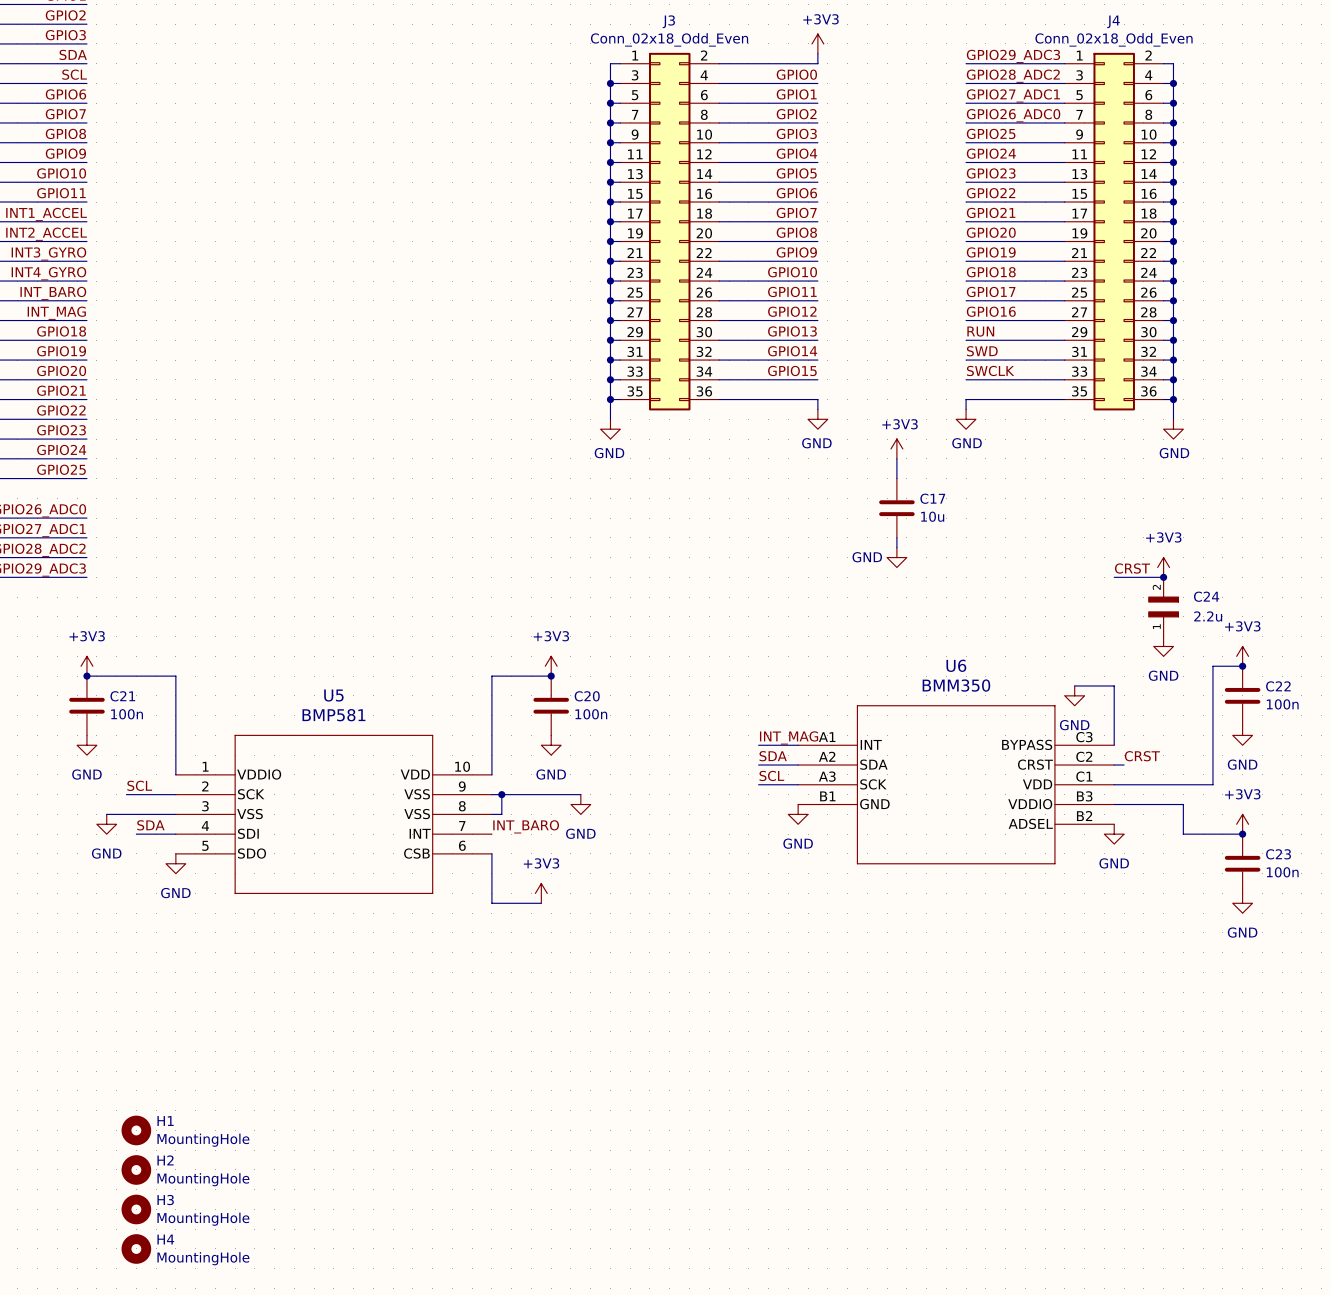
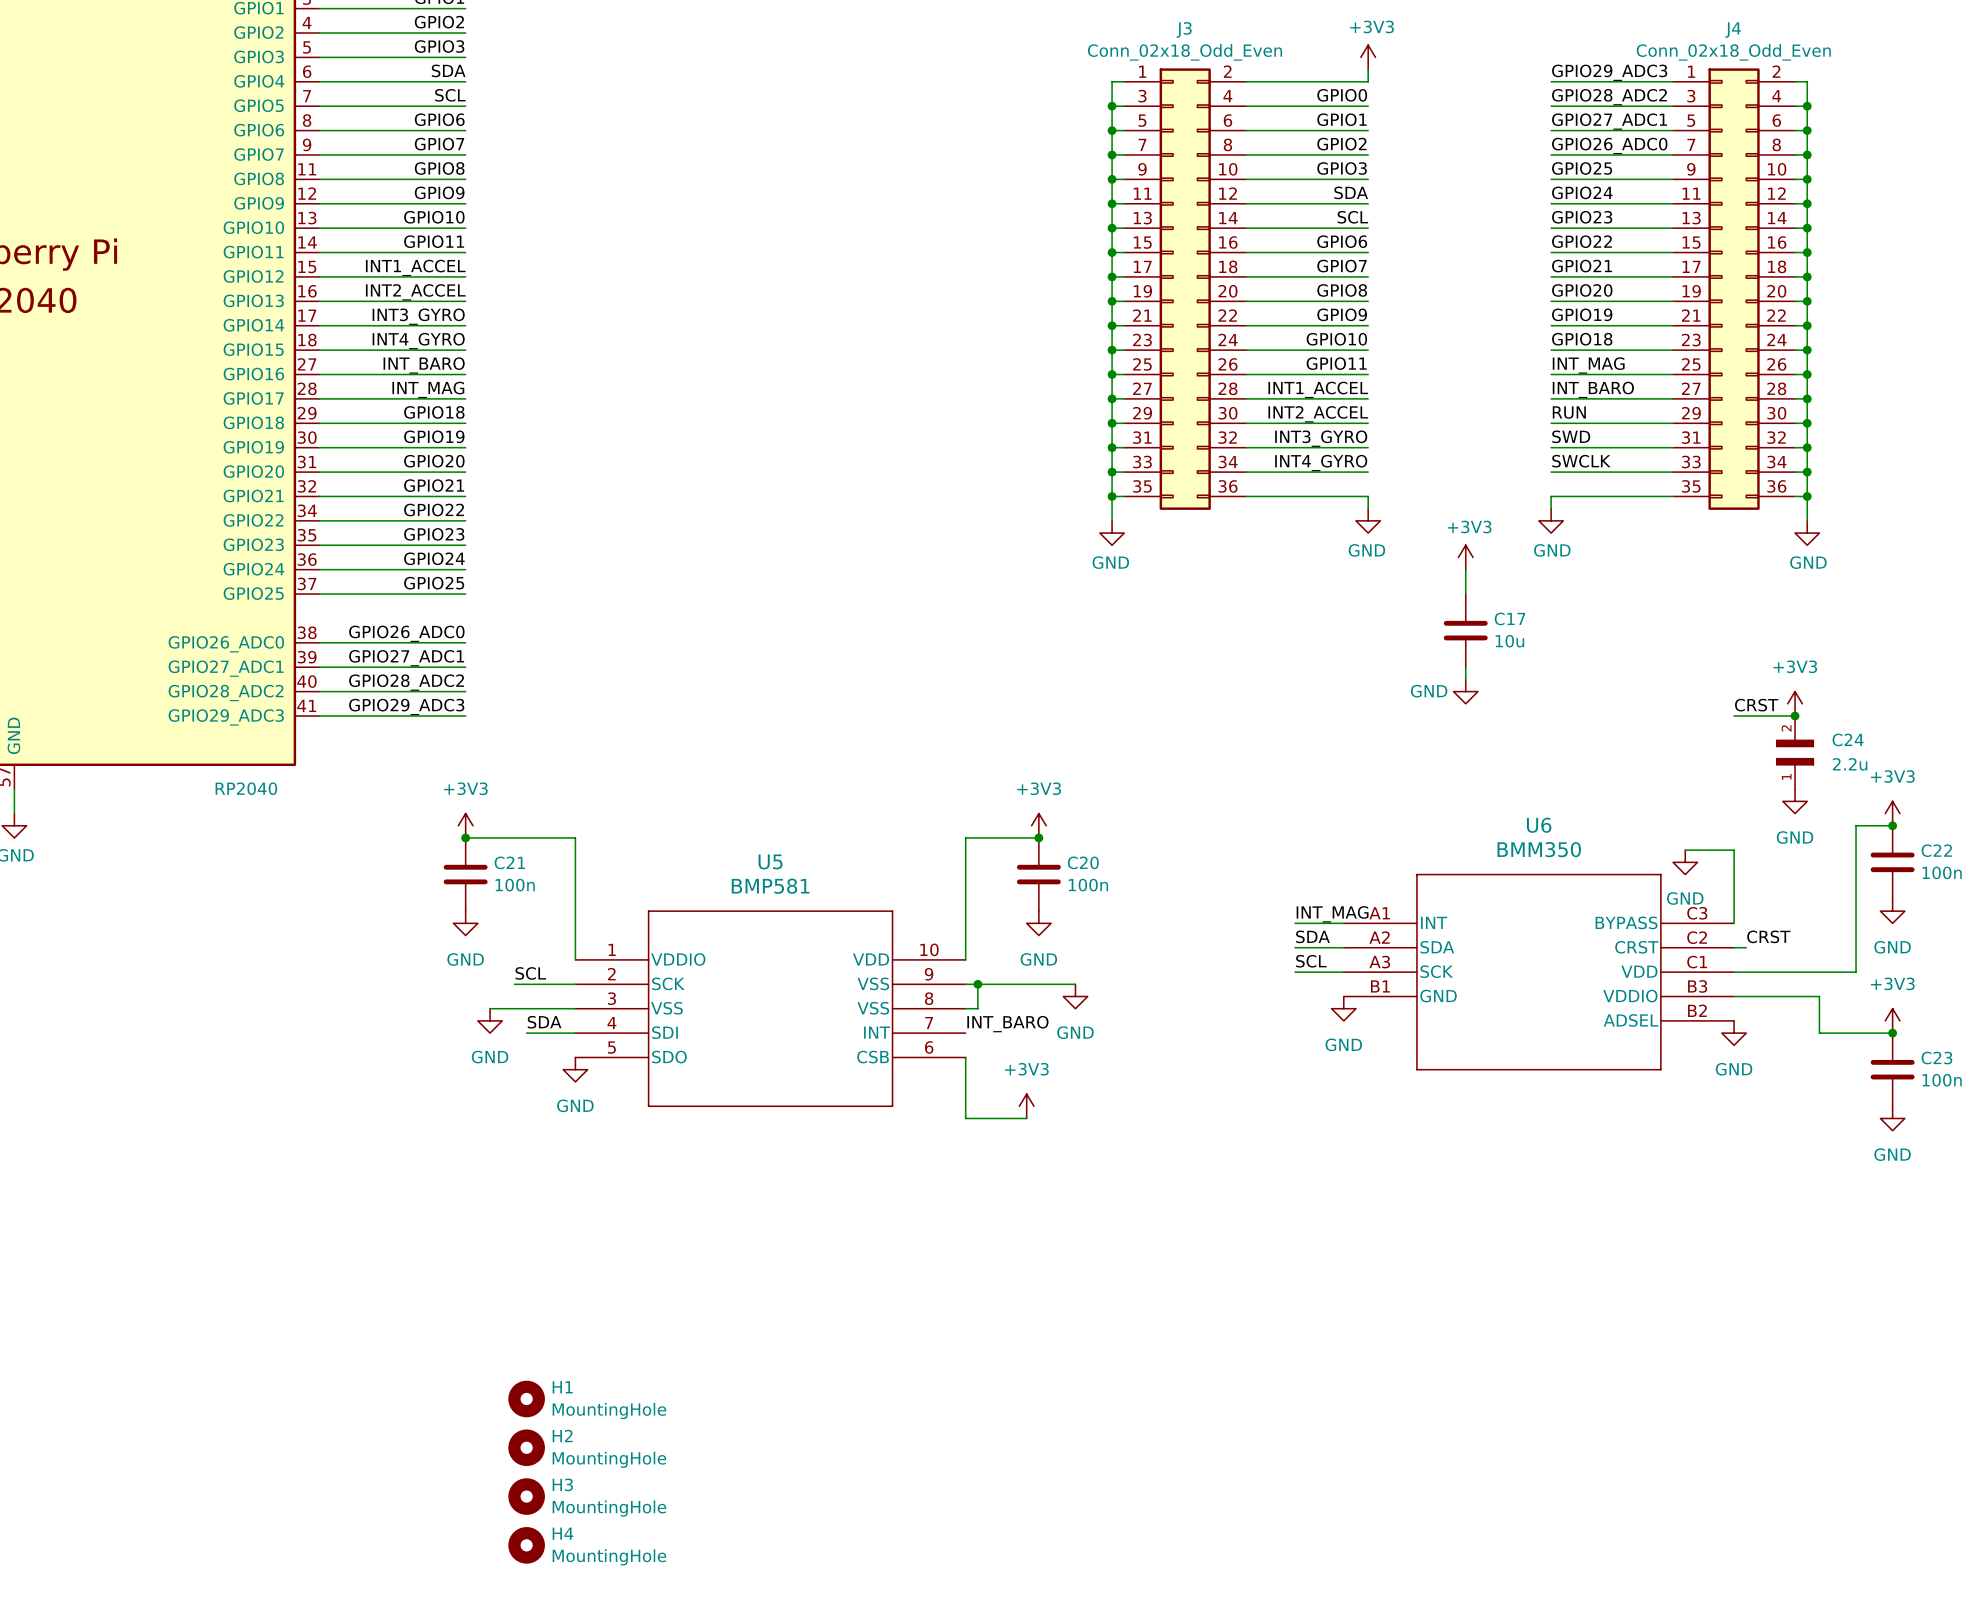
label: GPIO4 (796, 153) -> SDA (1351, 192)
label: GPIO5 (796, 173) -> SCL (1352, 217)
label: GPIO17 (991, 291) -> INT_MAG (1588, 365)
label: GPIO12 (792, 311) -> INT1_ACCEL (1318, 389)
label: GPIO16 (991, 311) -> INT_BARO (1593, 389)
label: GPIO13 (792, 331) -> INT2_ACCEL (1318, 414)
label: GPIO14 (792, 351) -> INT3_GYRO (1321, 438)
label: GPIO15 (792, 370) -> INT4_GYRO (1321, 463)

